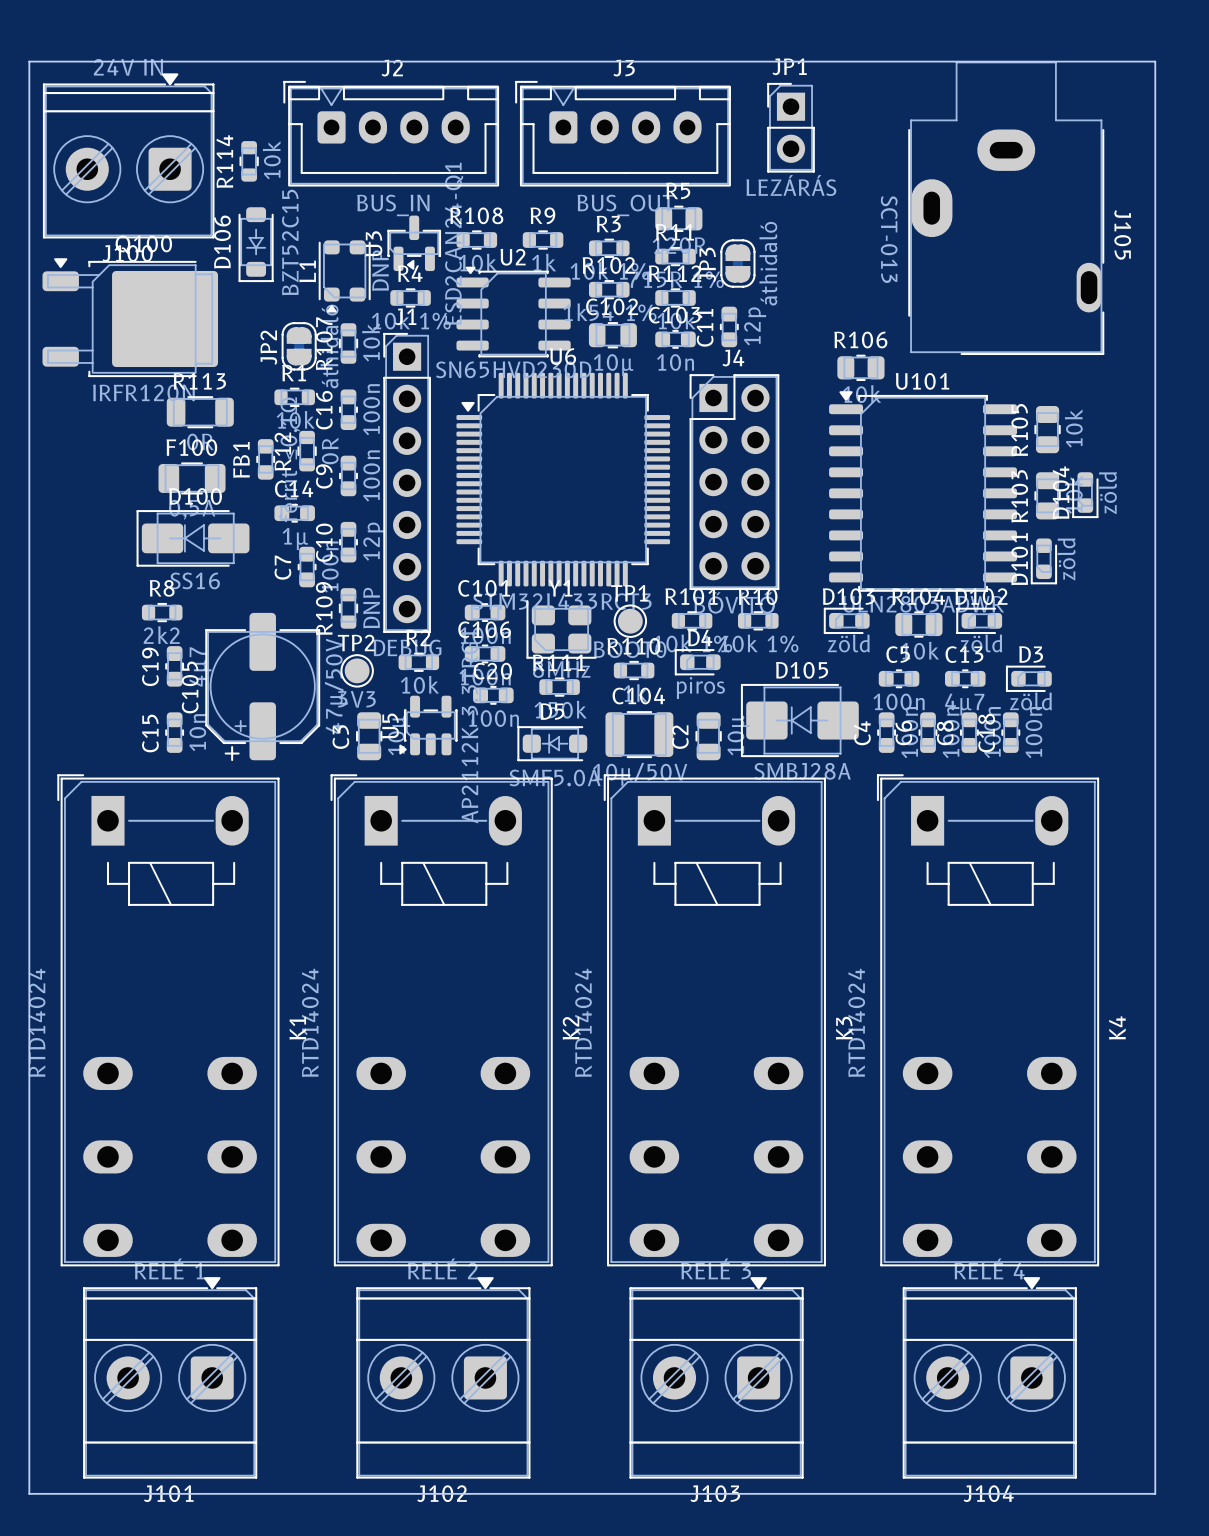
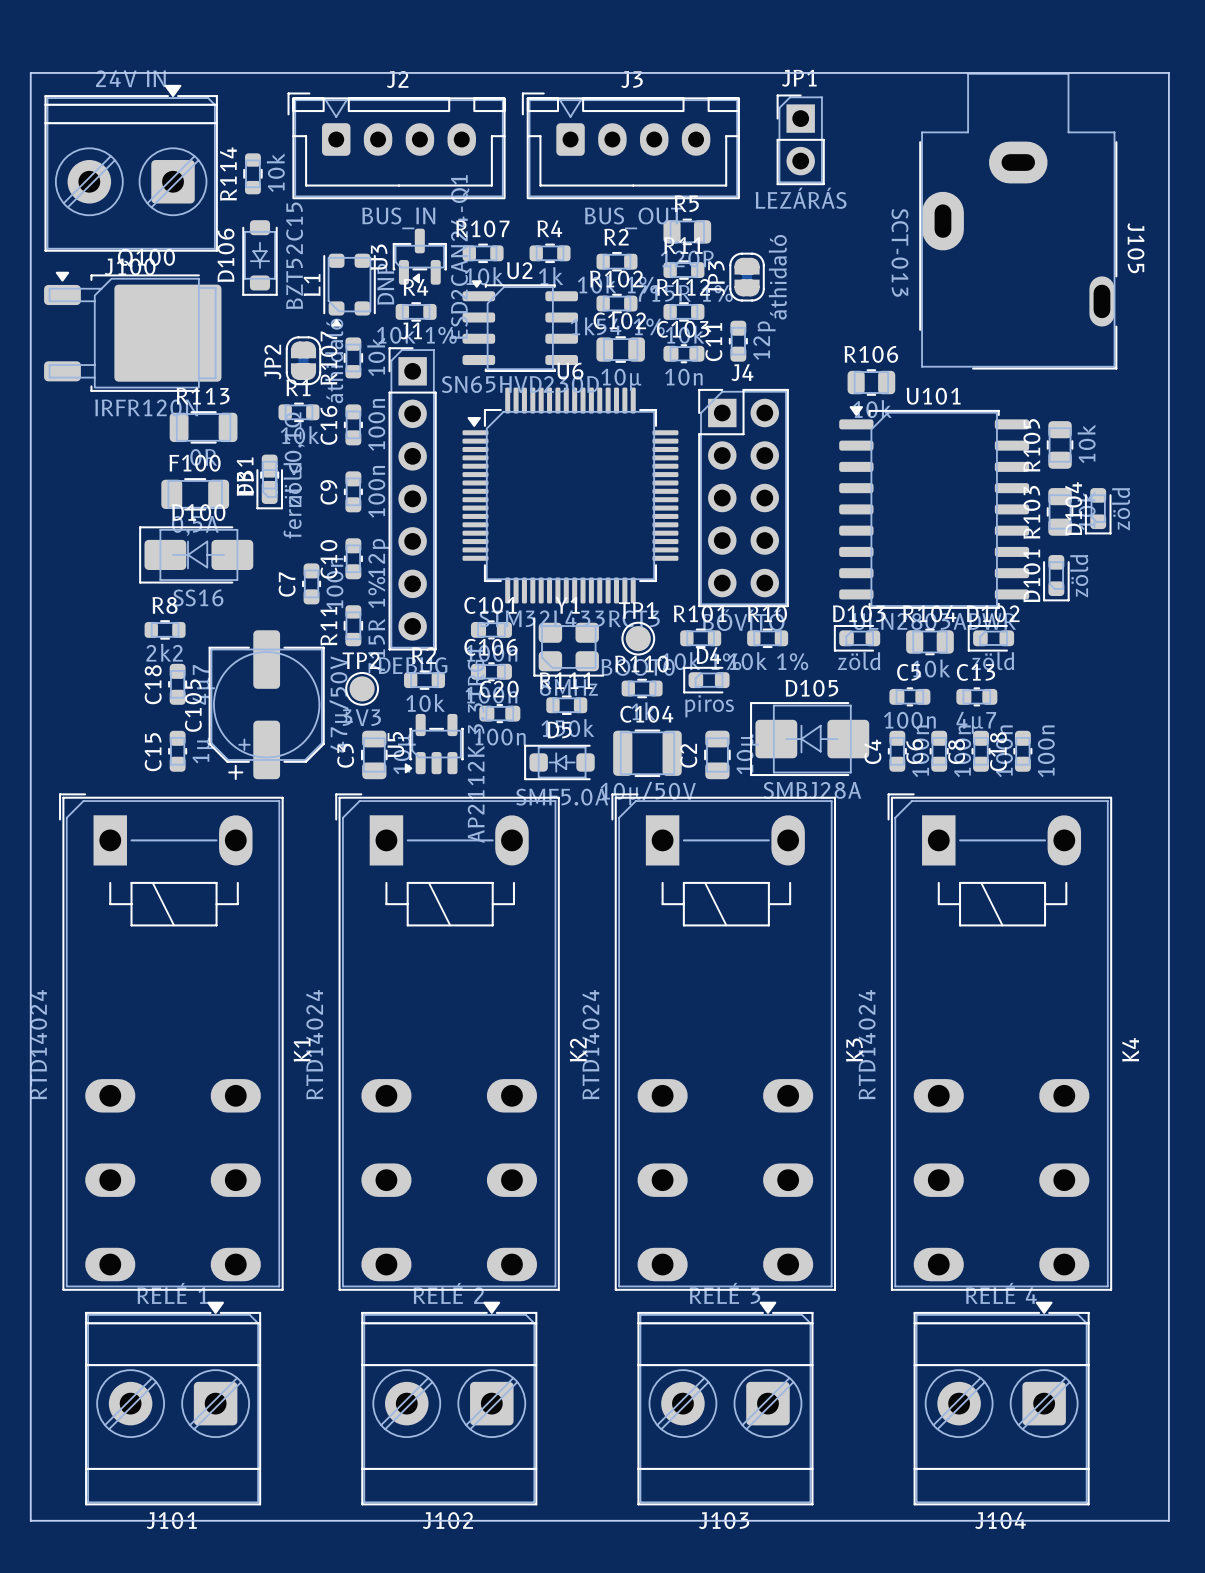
R108 name: R108 (476, 215) -> R107 (482, 228)
R9 name: R9 (542, 215) -> R4 (549, 228)
R3 name: R3 (608, 224) -> R2 (616, 237)
R12: 0R (307, 451) -> none
C14: 1µ (294, 513) -> none
R109 name: R109 (324, 608) -> R11 (328, 626)
R109 value: DNP (371, 608) -> 715R 1% (376, 625)
C19 name: C19 (150, 666) -> C18 (153, 684)
D3 rotation: 0° (1028, 678) -> 90° counterclockwise (269, 486)
D3 position: (1028, 678) -> (269, 486)
C15 value: 10n (197, 732) -> 1µ (203, 750)

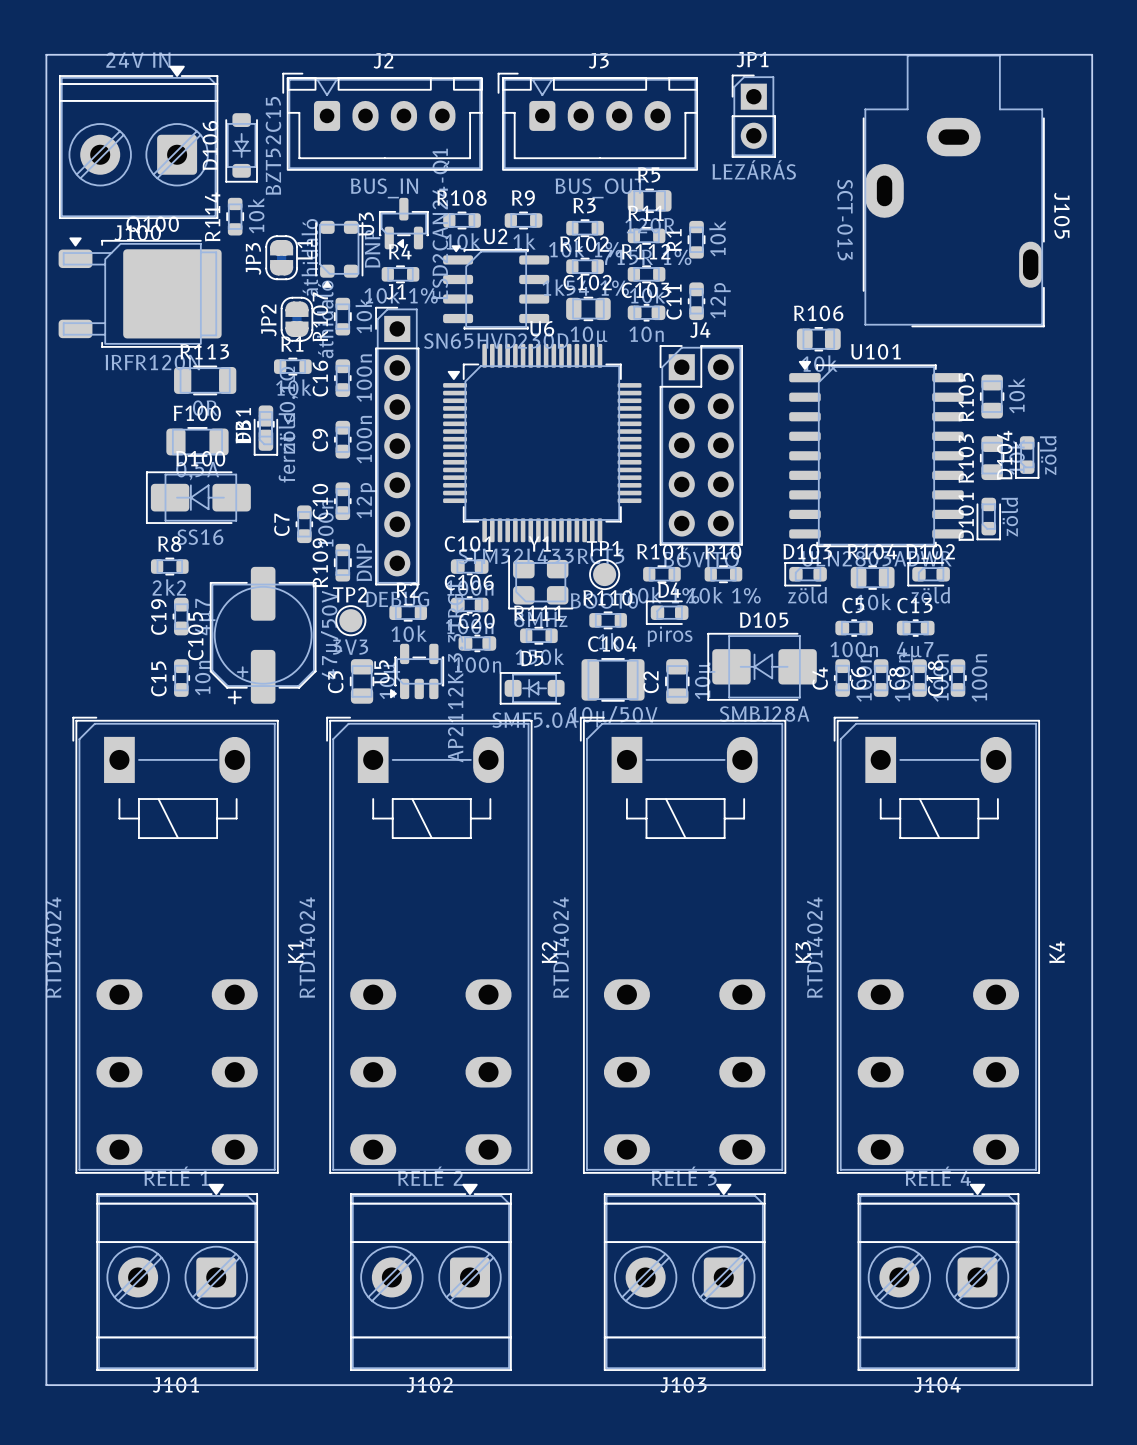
R114 position: (252, 173) -> (235, 216)
R107 name: R107 (482, 228) -> R108 (461, 198)
R4 name: R4 (549, 228) -> R9 (523, 198)
R2 name: R2 (616, 237) -> R3 (584, 205)
D106 position: (259, 258) -> (241, 147)
R1: none -> 10k (696, 239)
JP3 position: (747, 277) -> (281, 257)
R11 value: 715R 1% (376, 625) -> DNP (364, 562)
R11 name: R11 (328, 626) -> R109 (320, 562)
C18 name: C18 (153, 684) -> C19 (158, 616)
C15 value: 1µ (203, 750) -> 10n (202, 678)

